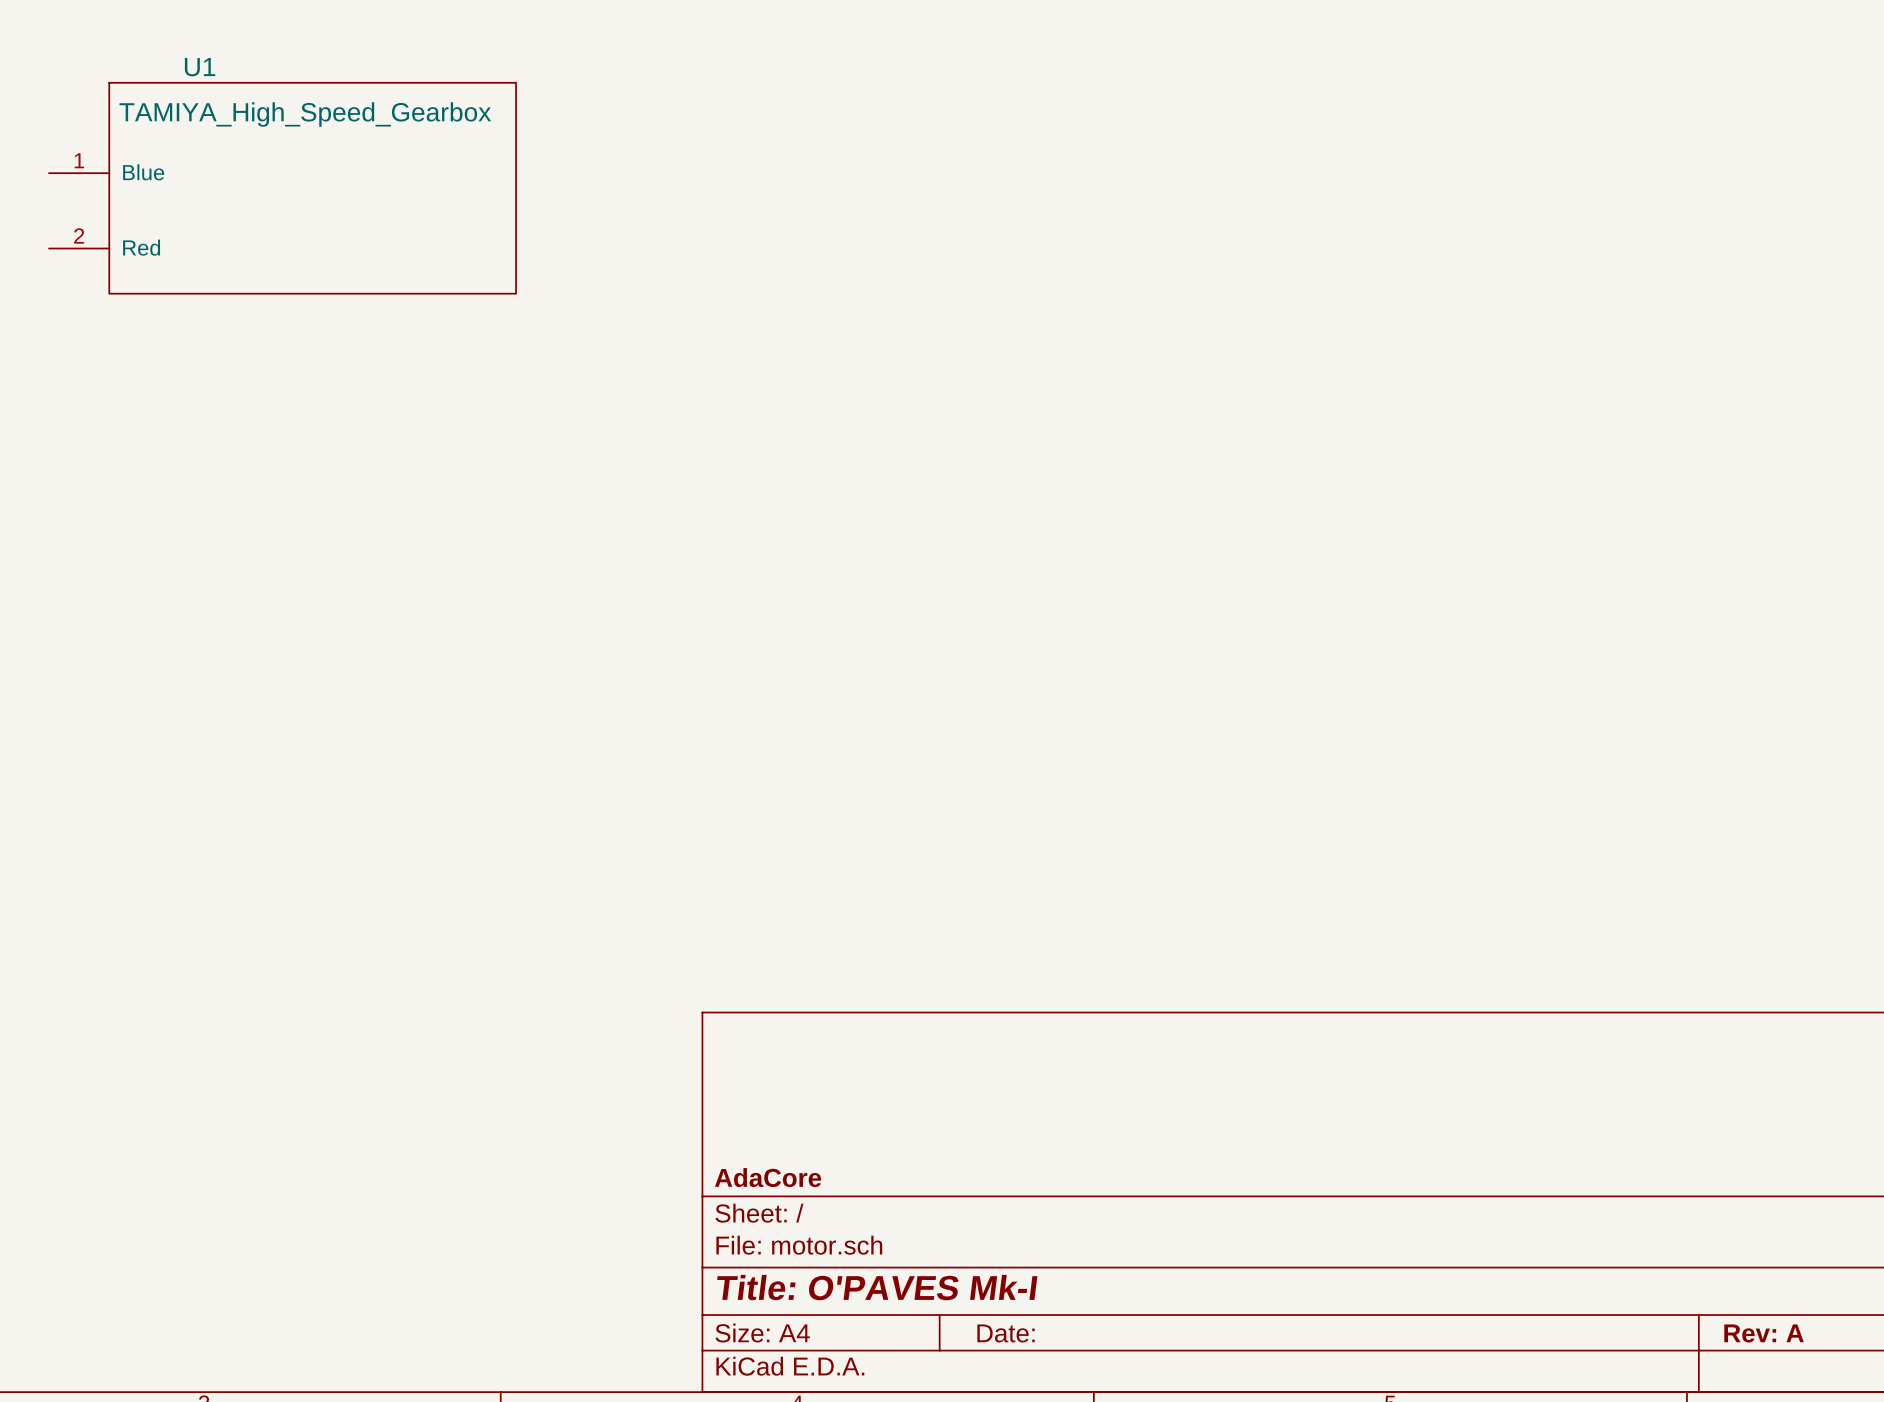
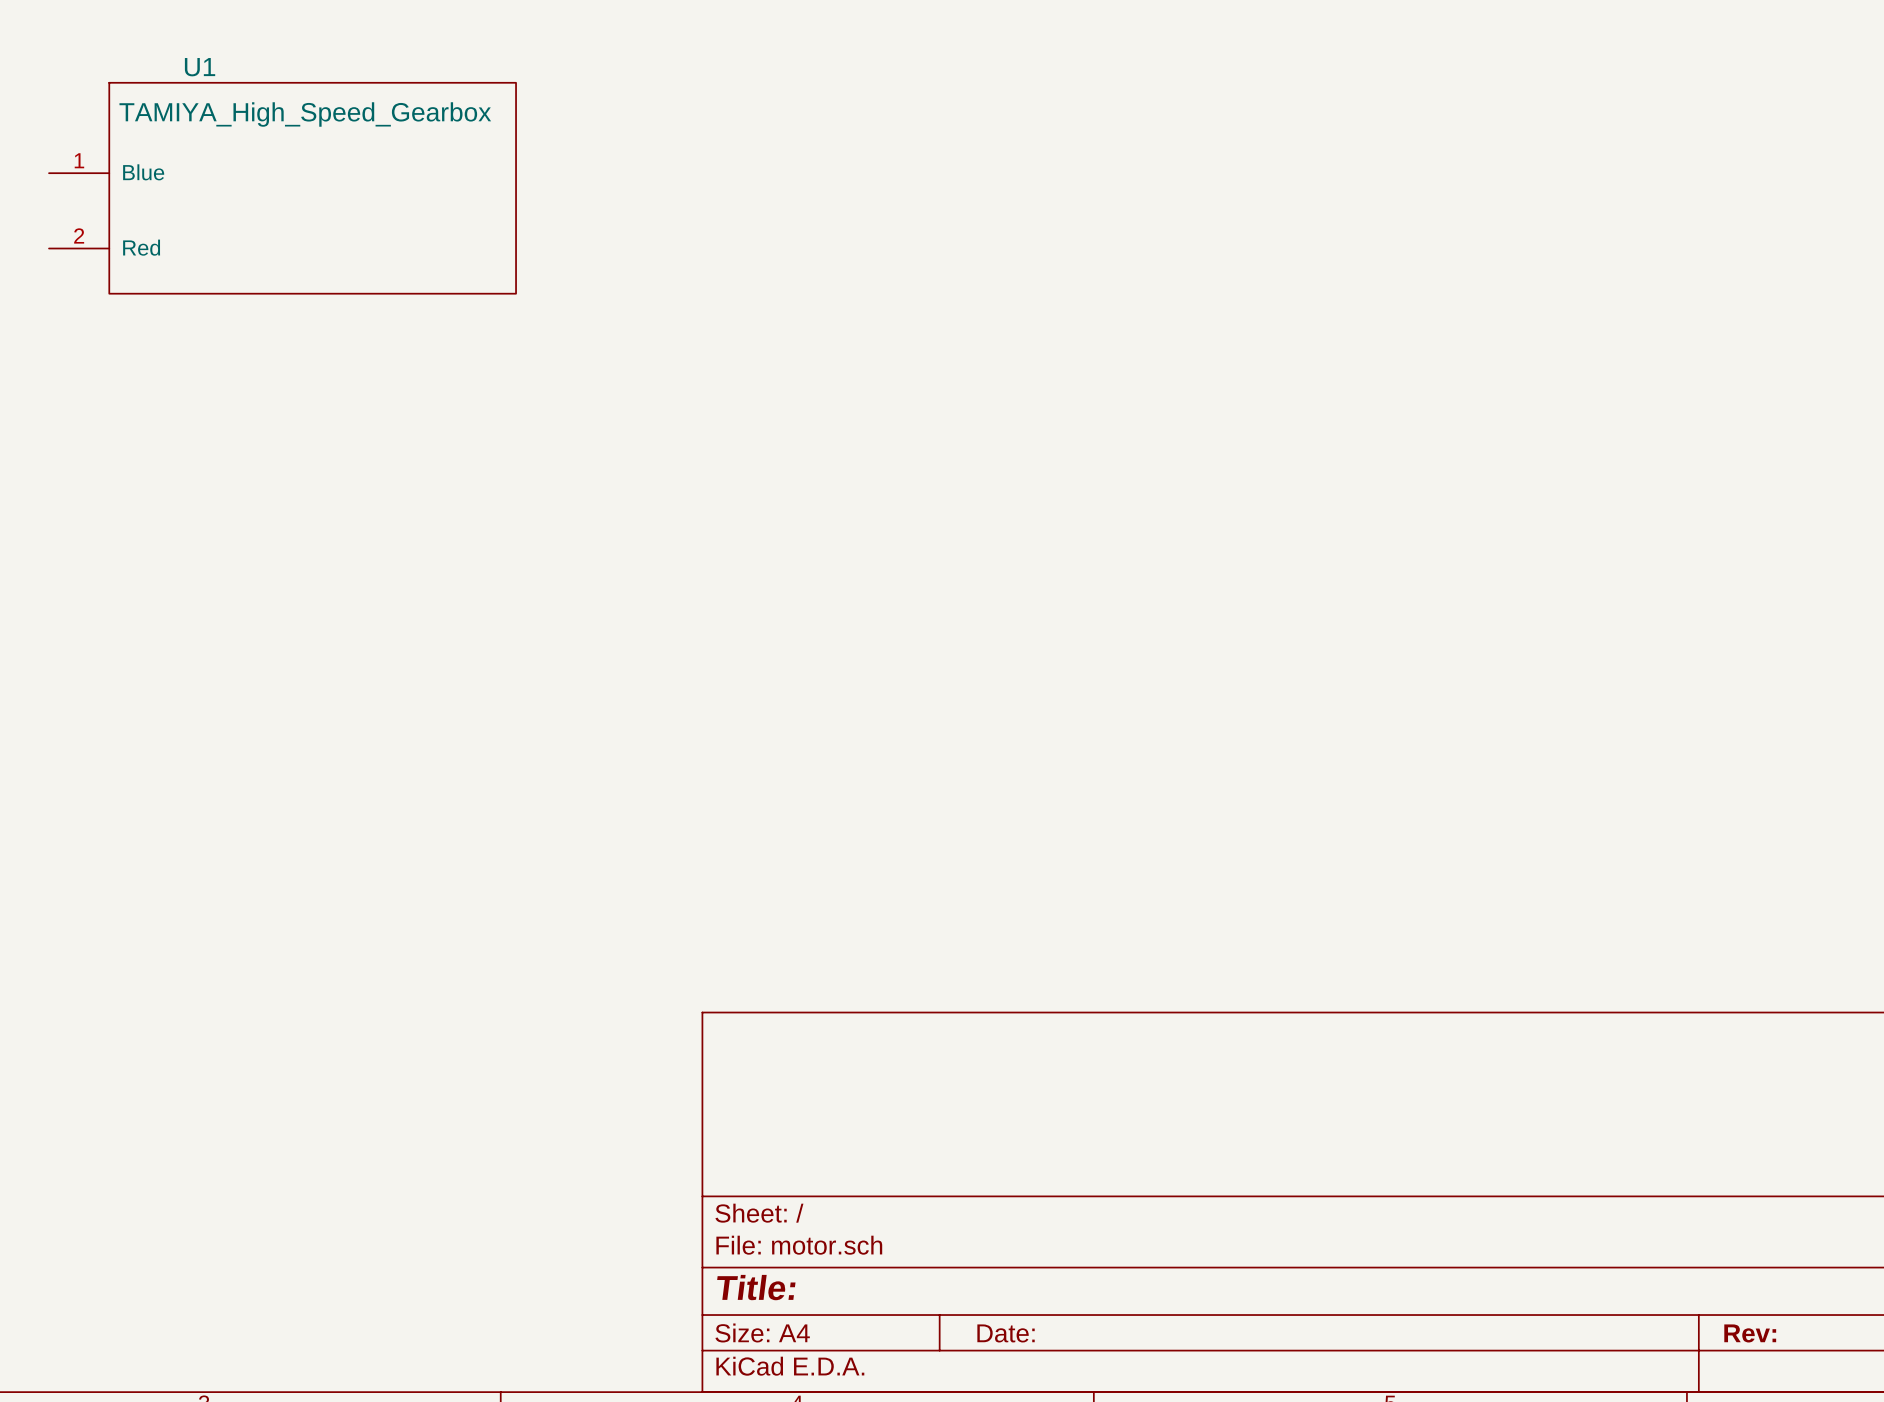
title block: AdaCore (768, 1177) -> none
title block: Title: O'PAVES Mk-I (877, 1287) -> Title: (756, 1287)
title block: Rev: A (1764, 1333) -> Rev: (1750, 1333)

